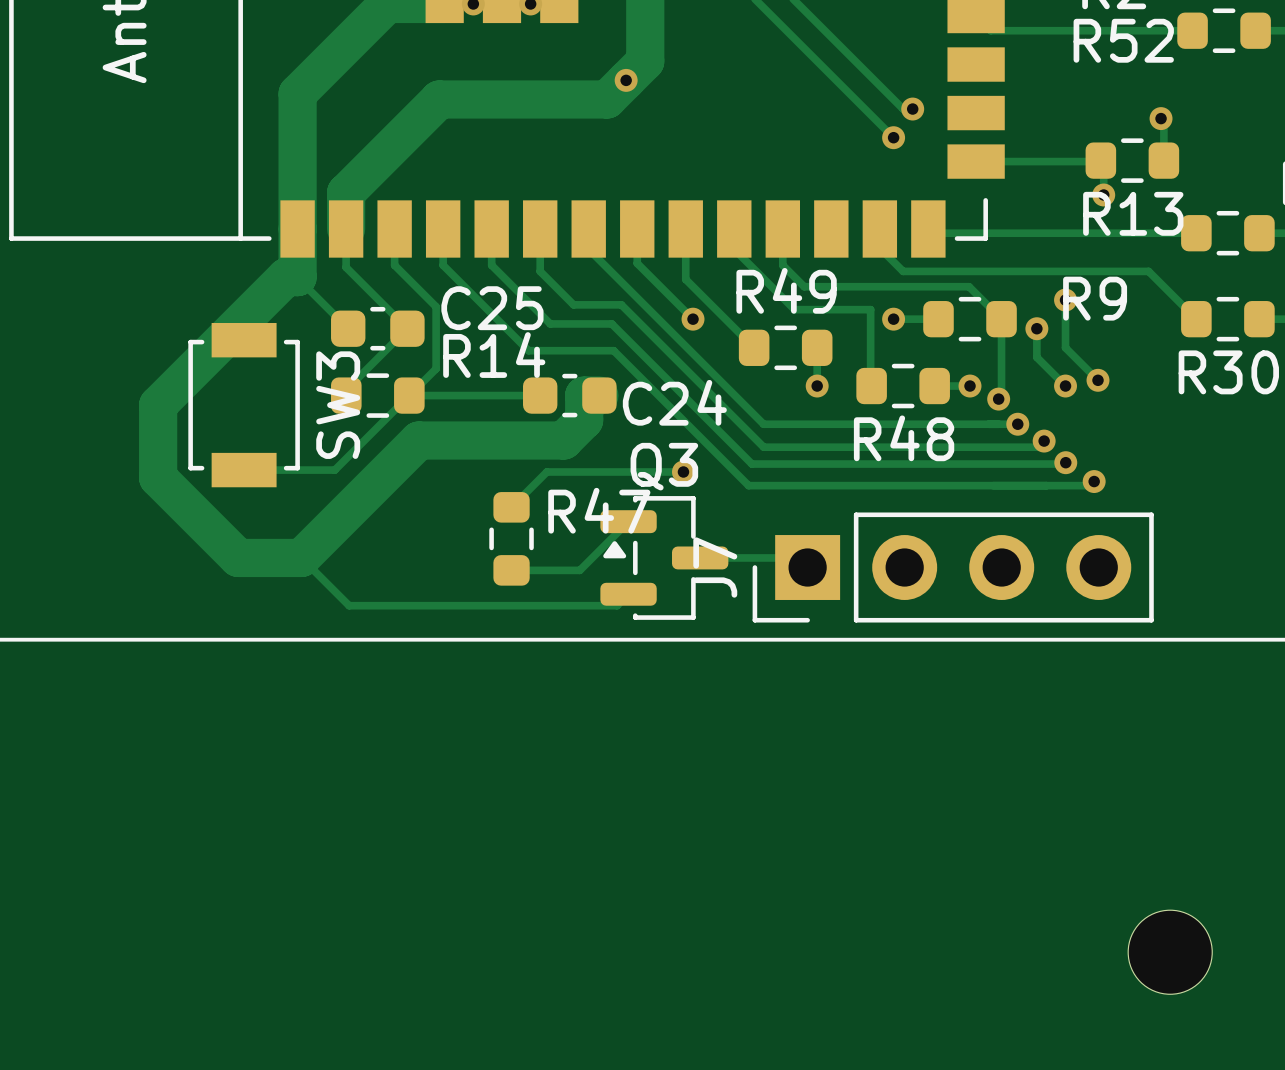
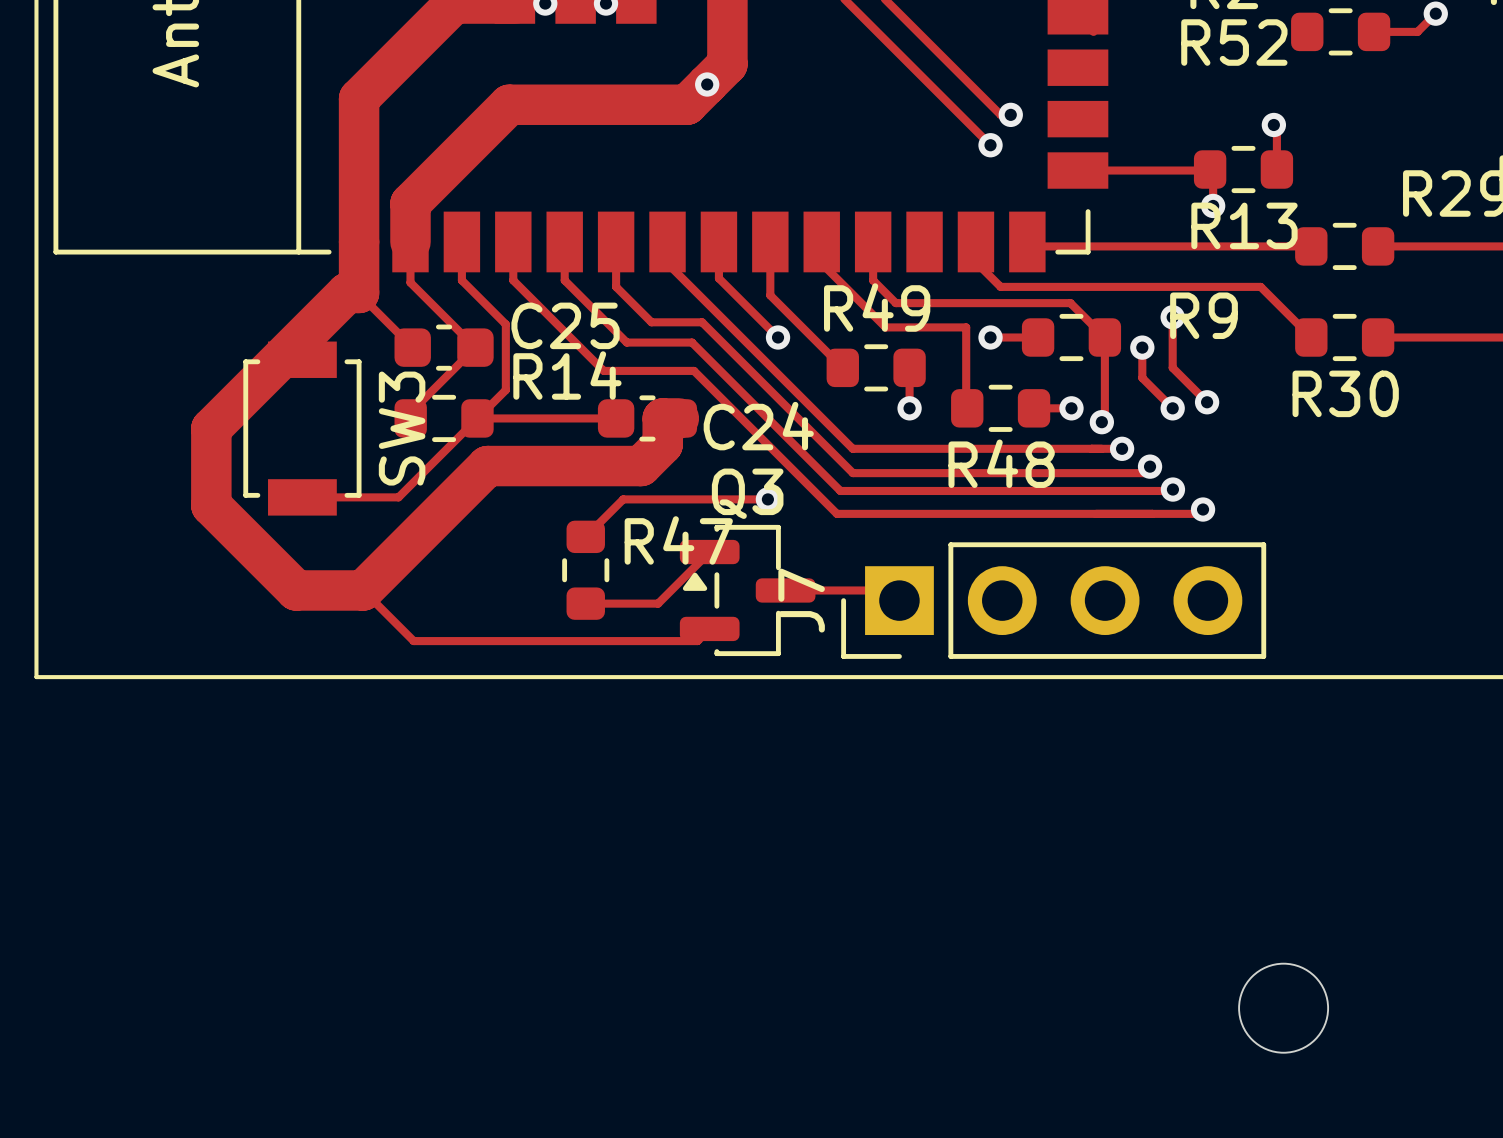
track: (990, 30) (1192, 30) -> none

